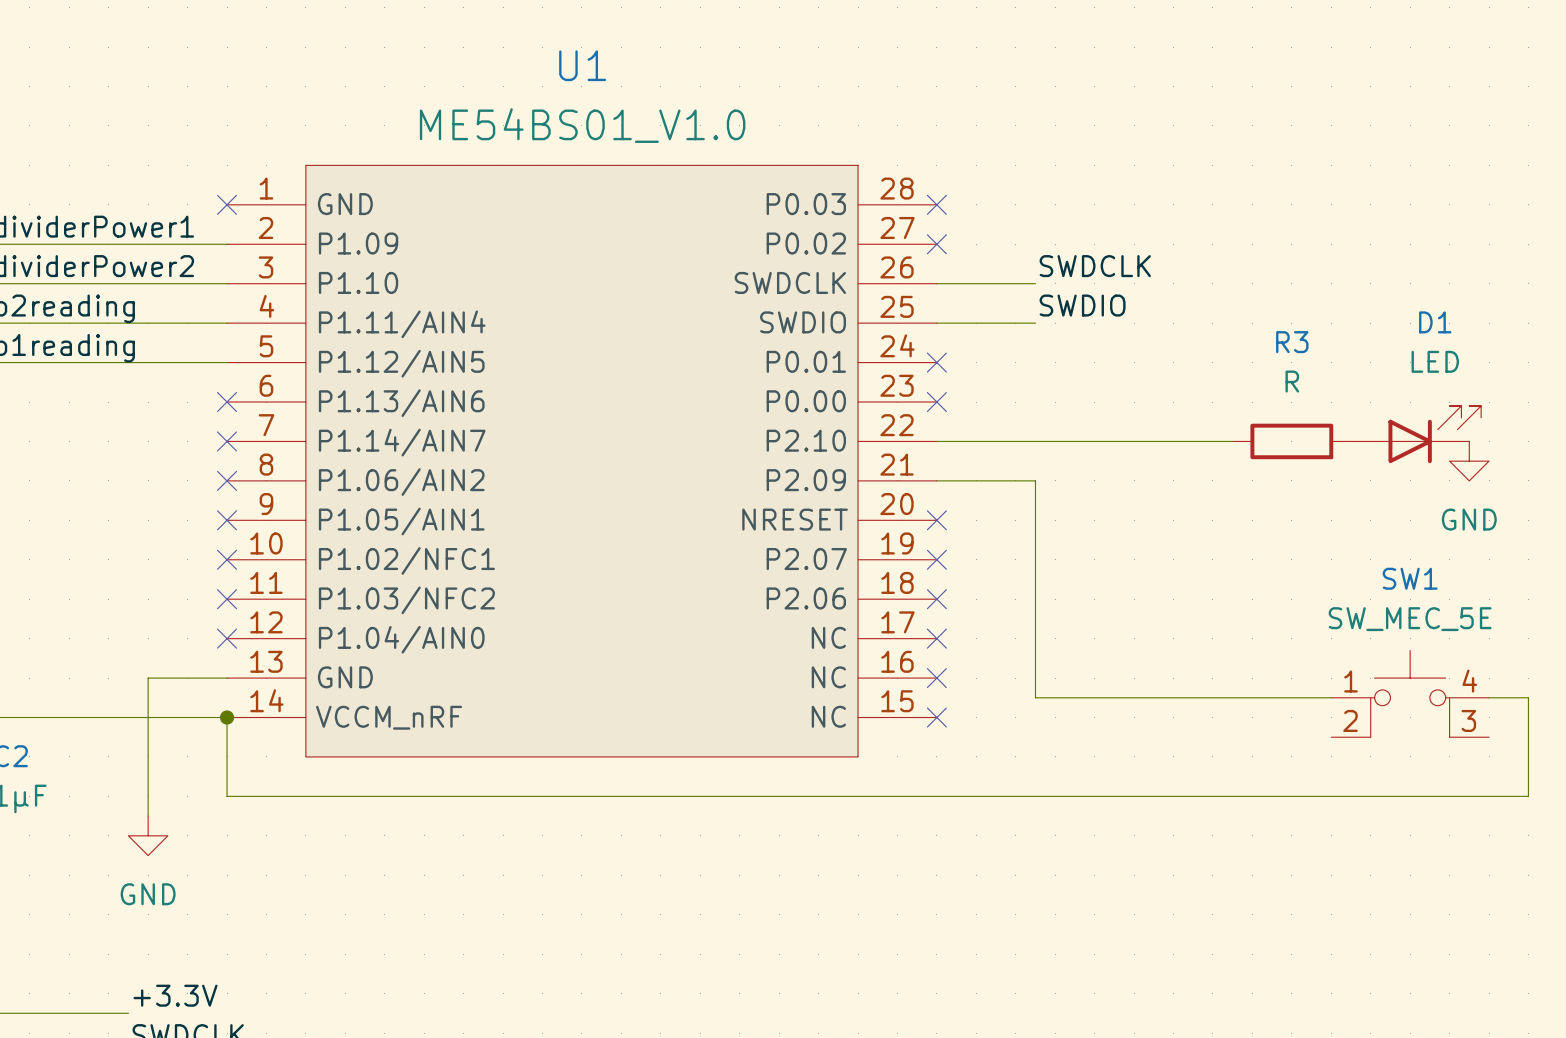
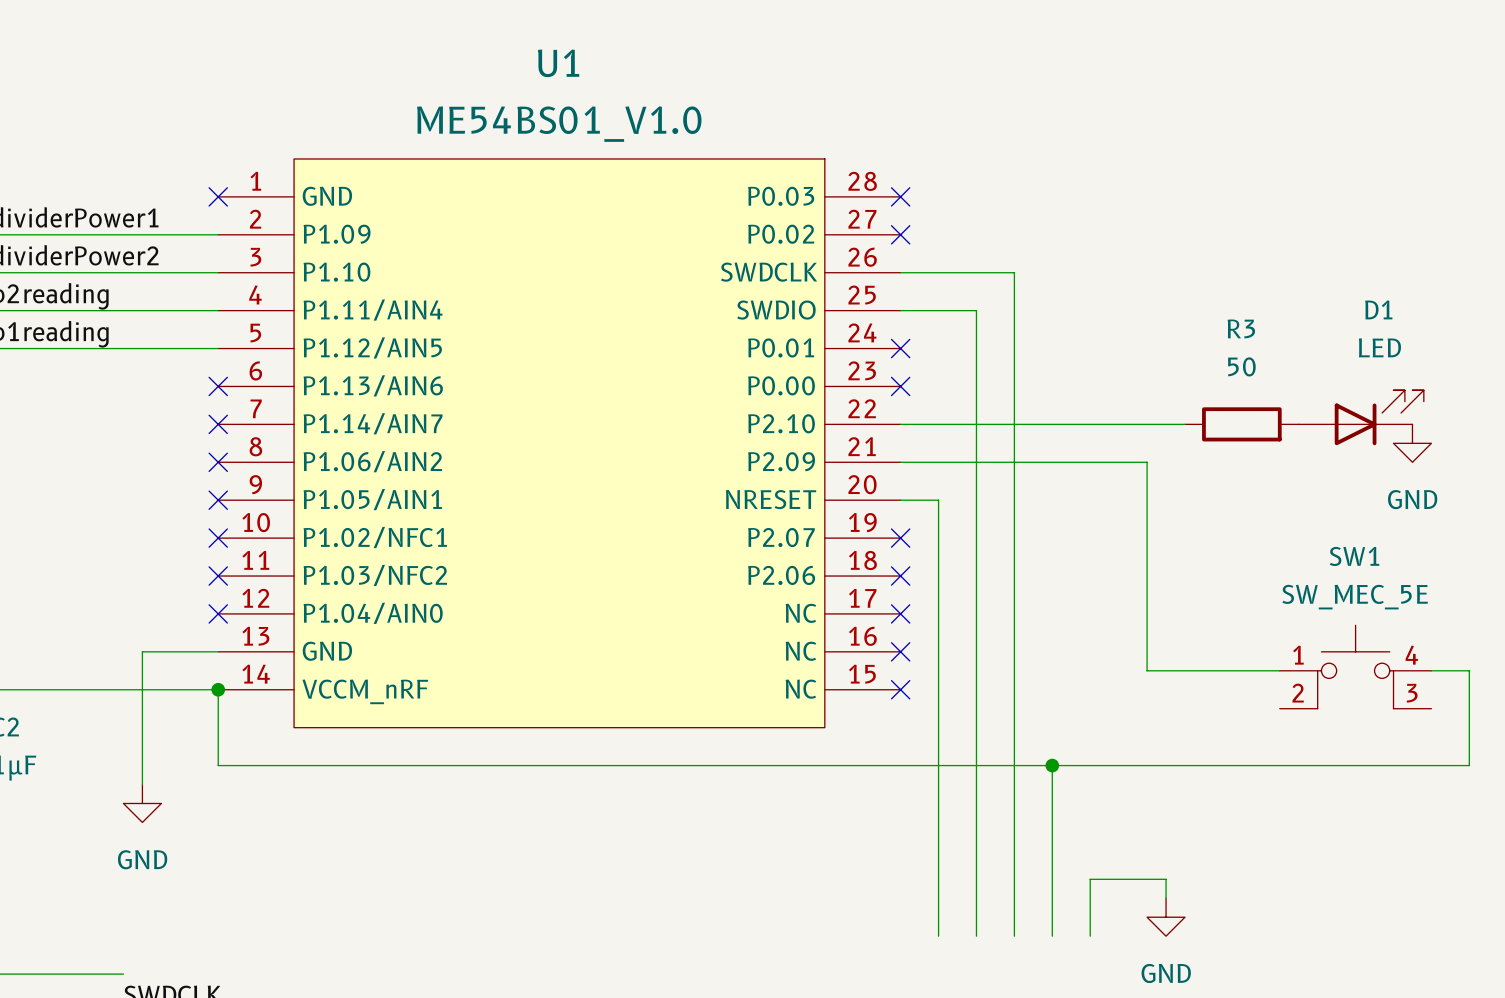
label: SWDCLK (1095, 266) -> none
wire: none -> (995, 272) (1014, 272) (1014, 936)
label: SWDIO (1082, 305) -> none
wire: (1015, 323) (1035, 323) -> (976, 310) (976, 936)
R3 value: R (1292, 381) -> 50 (1241, 366)
wire: (1035, 480) (1035, 697) (1193, 697) -> (995, 462) (1147, 462) (1147, 670)
wire: none -> (900, 500) (938, 500) (938, 936)
no-connect mark: (936, 520) -> none
wire: none -> (1052, 765) (1052, 936)
junction: none -> (1052, 765)
wire: none -> (1166, 898) (1166, 879) (1090, 879) (1090, 936)
power symbol: none -> GND (1166, 917)
label: +3.3V (175, 995) -> none

